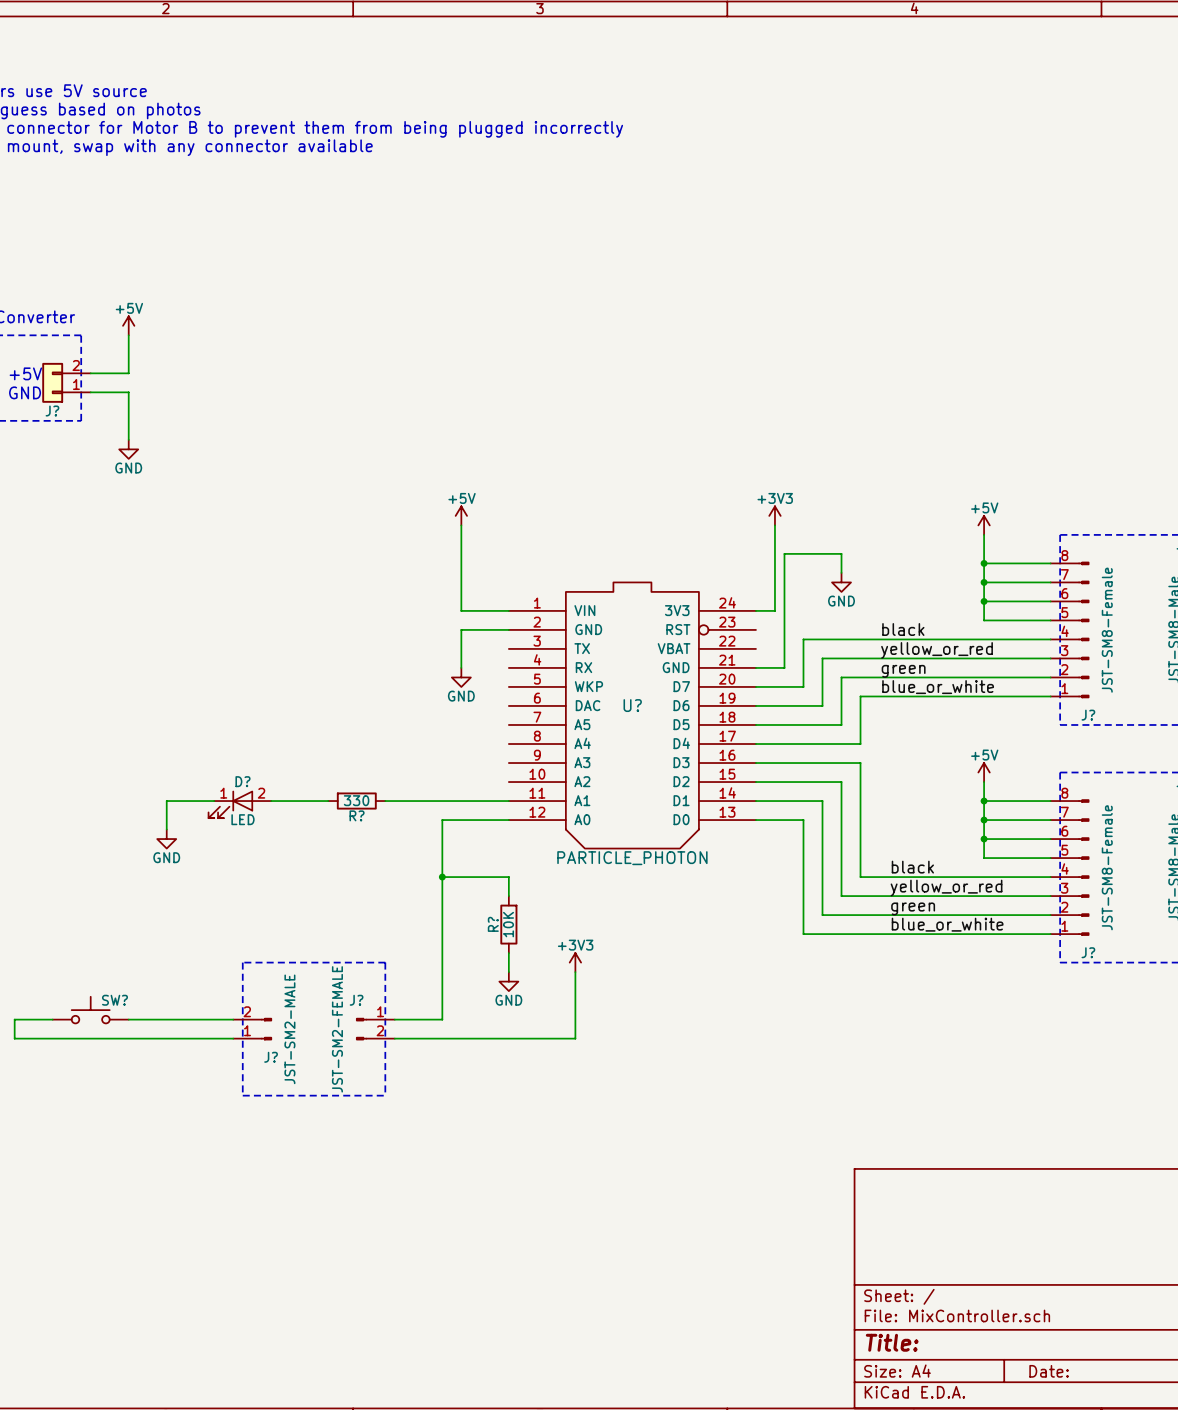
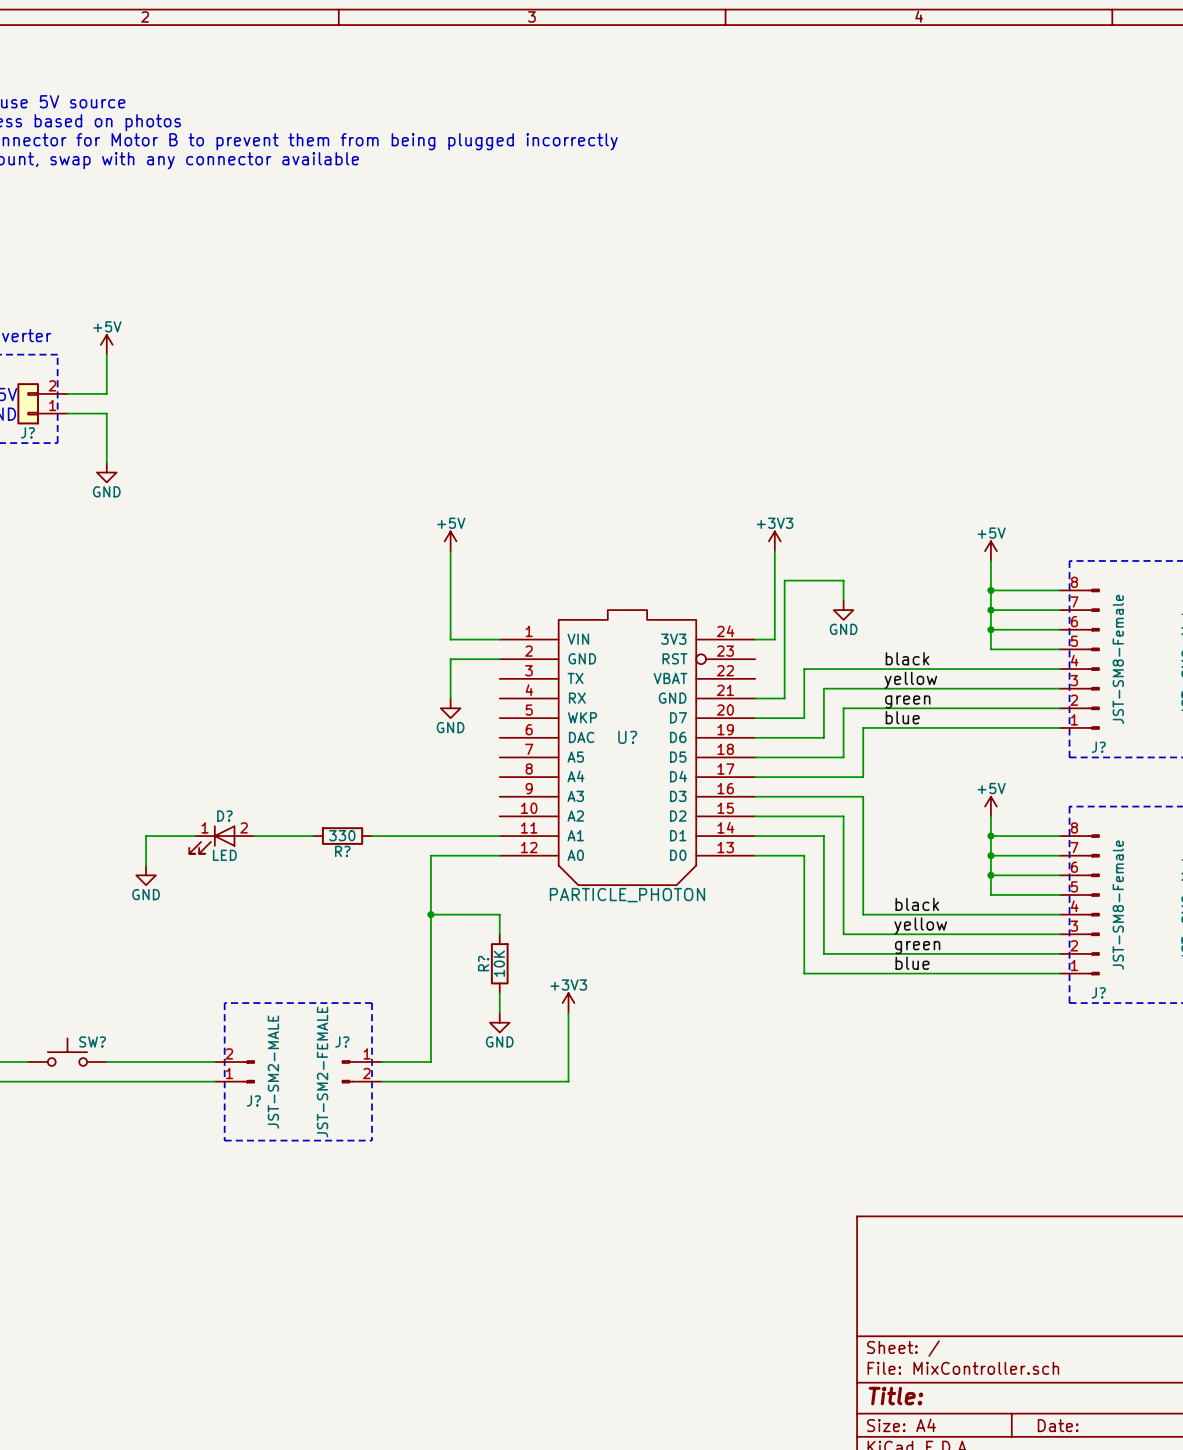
label: yellow_or_red (937, 650) -> yellow (910, 680)
label: blue_or_white (938, 687) -> blue (902, 717)
label: yellow_or_red (946, 888) -> yellow (920, 925)
label: blue_or_white (947, 924) -> blue (912, 963)

